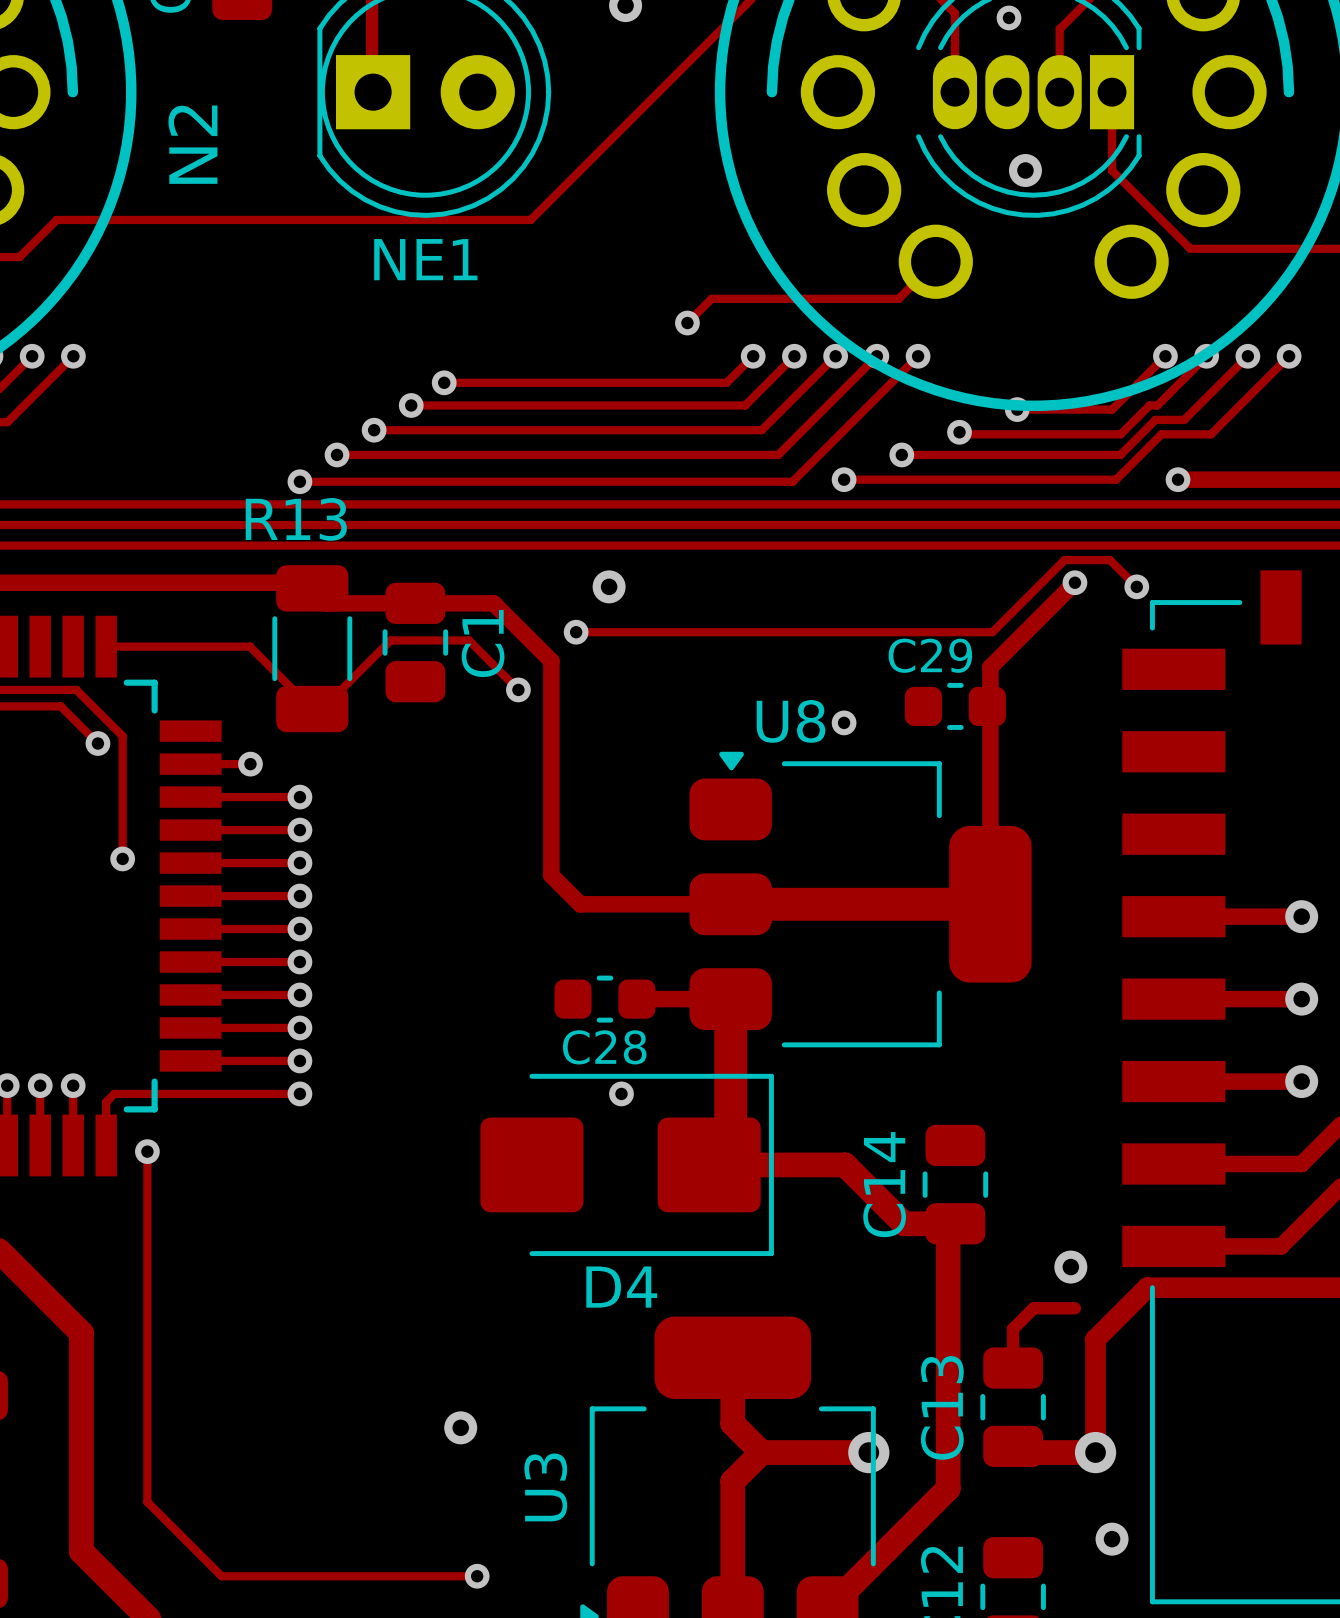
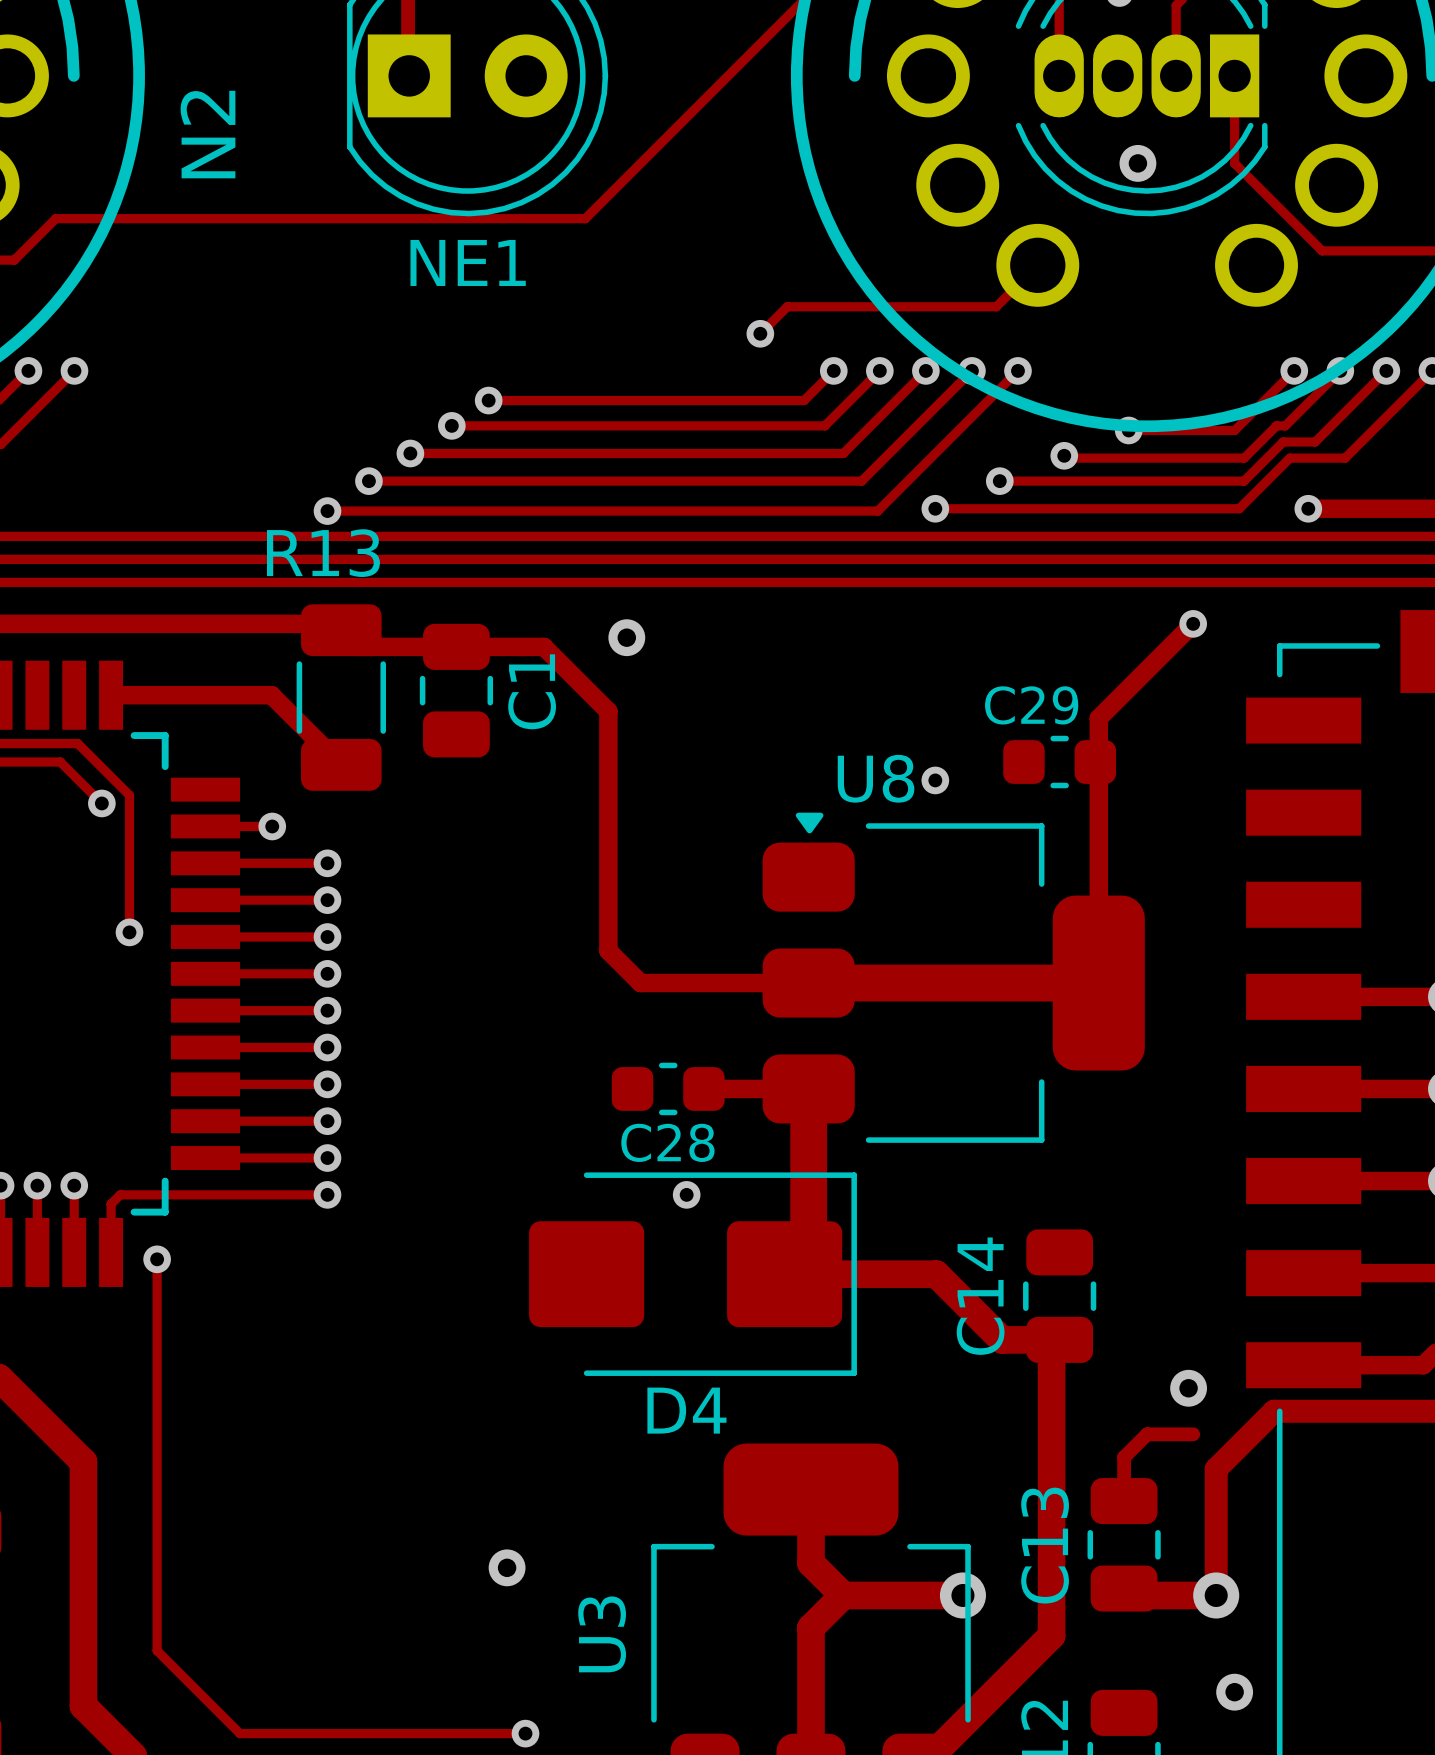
via position: (609, 586) -> (626, 637)
track: (1136, 586) (1109, 560) (1064, 560) (992, 632) (576, 632) -> none
via: (1136, 586) -> none
via: (576, 632) -> none
track width: thin (106, 646) (249, 646) (312, 708) -> thick (111, 695) (271, 695) (341, 764)
track: (518, 689) (468, 640) (390, 640) (322, 708) (312, 708) -> none
via: (518, 689) -> none

